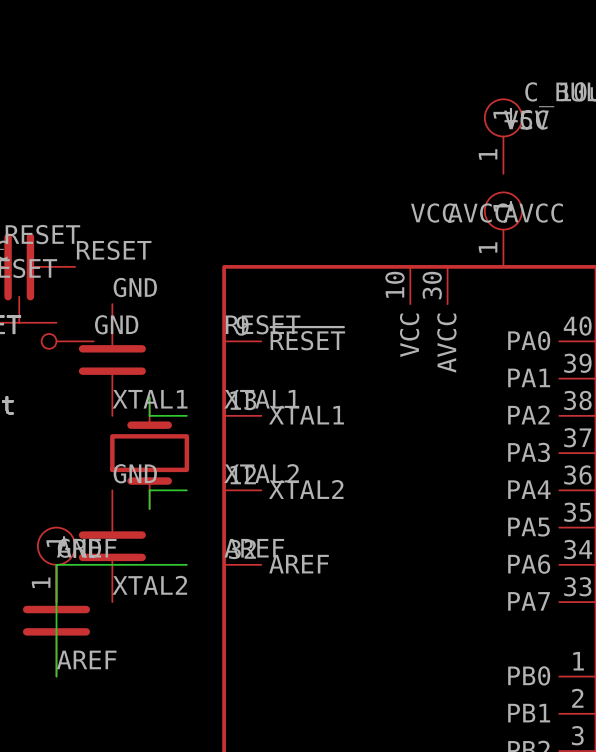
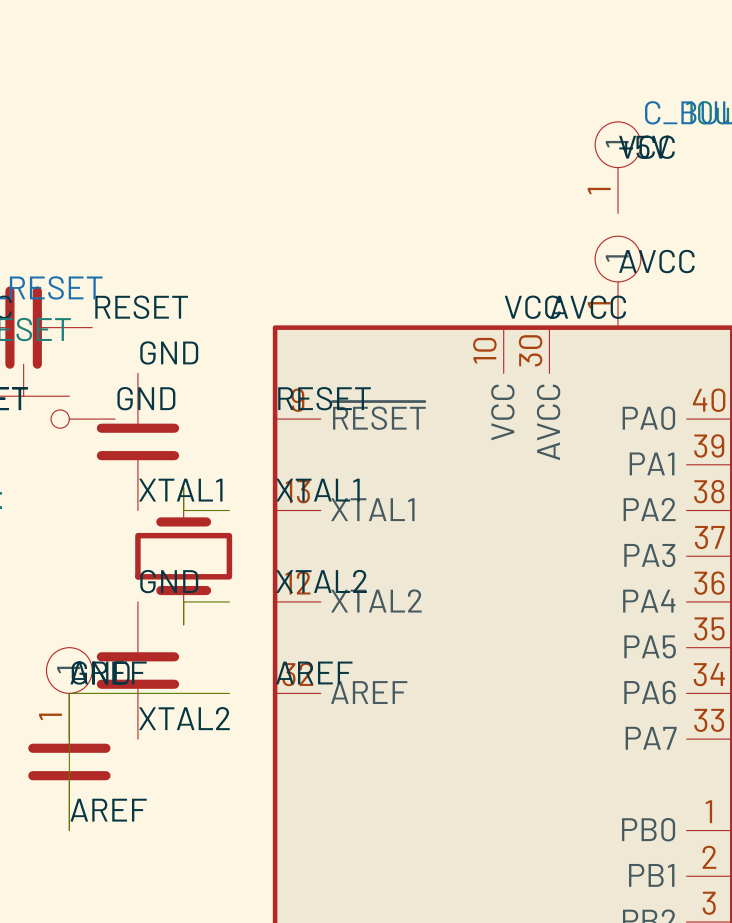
label position: VCC (432, 213) -> VCC (532, 307)
label position: AVCC (477, 213) -> AVCC (588, 307)

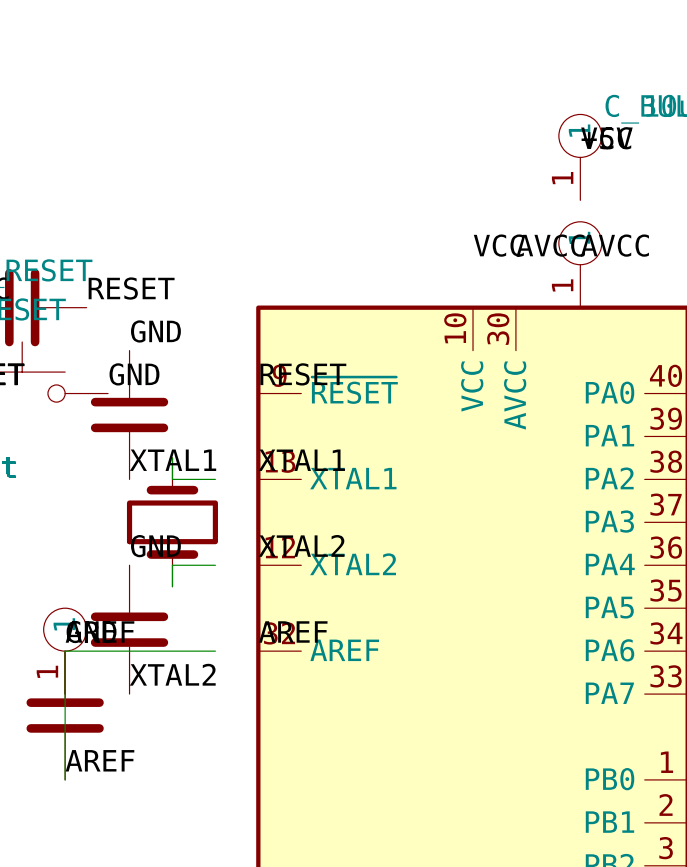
label position: VCC (532, 307) -> VCC (498, 245)
label position: AVCC (588, 307) -> AVCC (550, 245)

